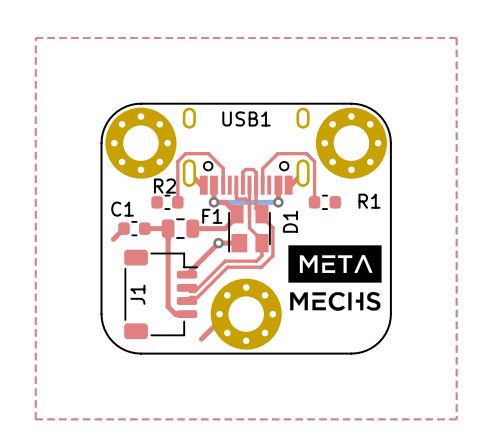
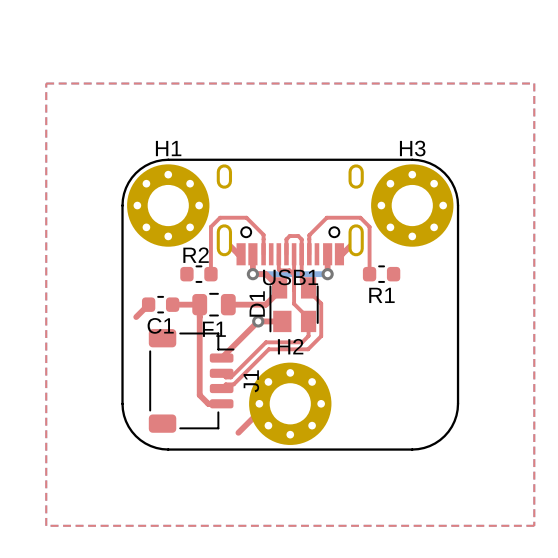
H1 name: none -> H1 (168, 148)
H3 name: none -> H3 (412, 148)
USB1 name position: USB1 (246, 118) -> USB1 (290, 277)
R1 name position: R1 (369, 201) -> R1 (381, 295)
C1 name position: C1 (122, 209) -> C1 (160, 325)
F1 name position: F1 (212, 216) -> F1 (214, 329)
D1 name position: D1 (290, 221) -> D1 (257, 303)
drawing: [288, 245, 382, 311] -> none
H2 name: none -> H2 (290, 346)
J1 name position: J1 (137, 294) -> J1 (251, 381)

